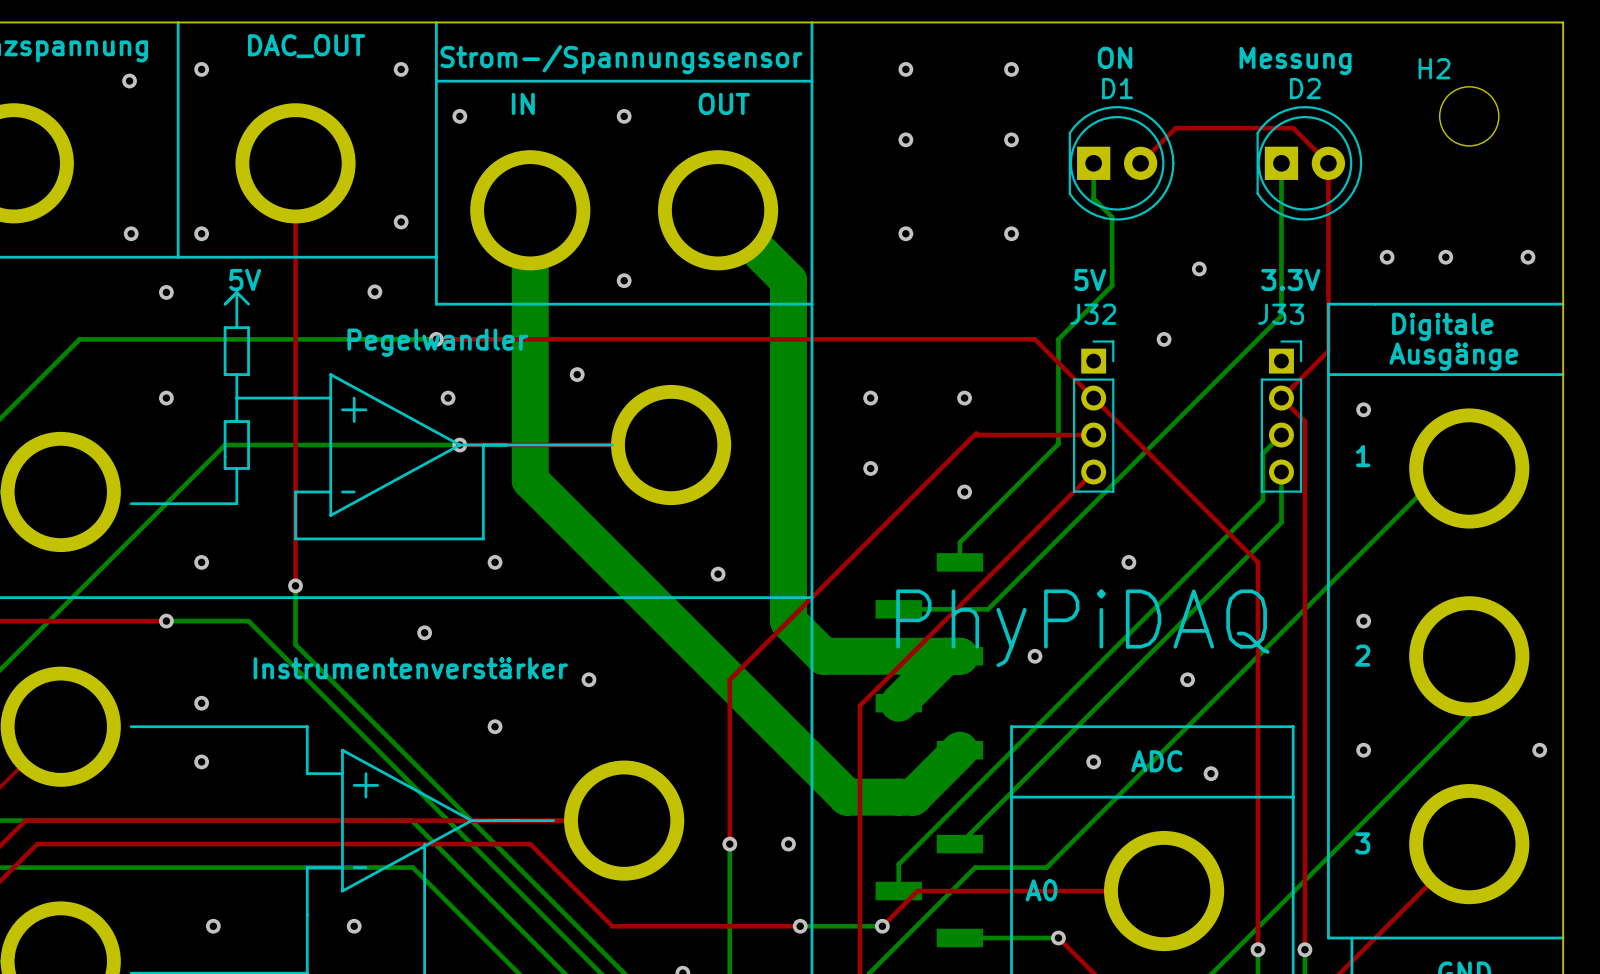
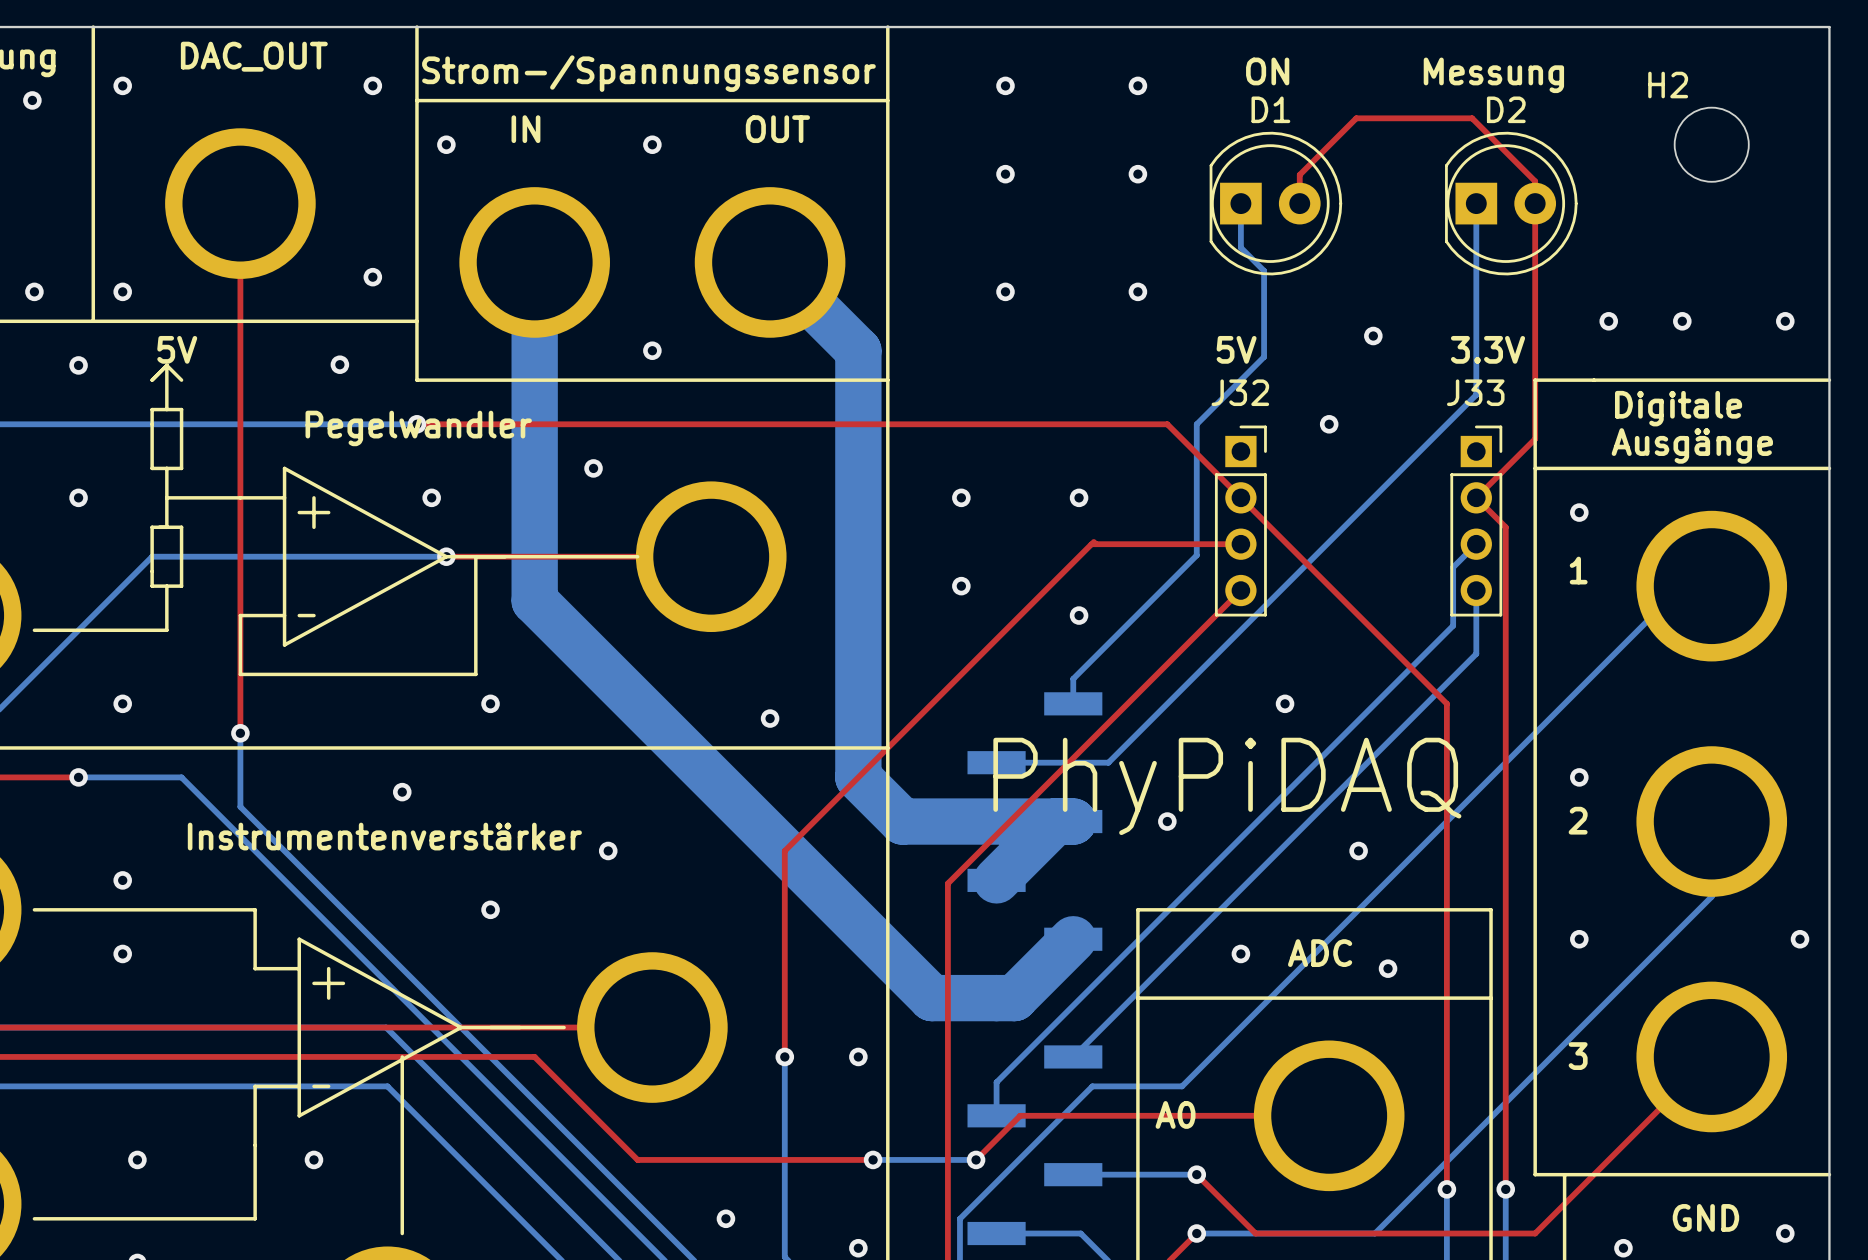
top track: (1140, 163) (1175, 128) (1293, 128) (1328, 163) -> (1299, 203) (1299, 174) (1356, 118) (1472, 118) (1535, 181) (1535, 203)

